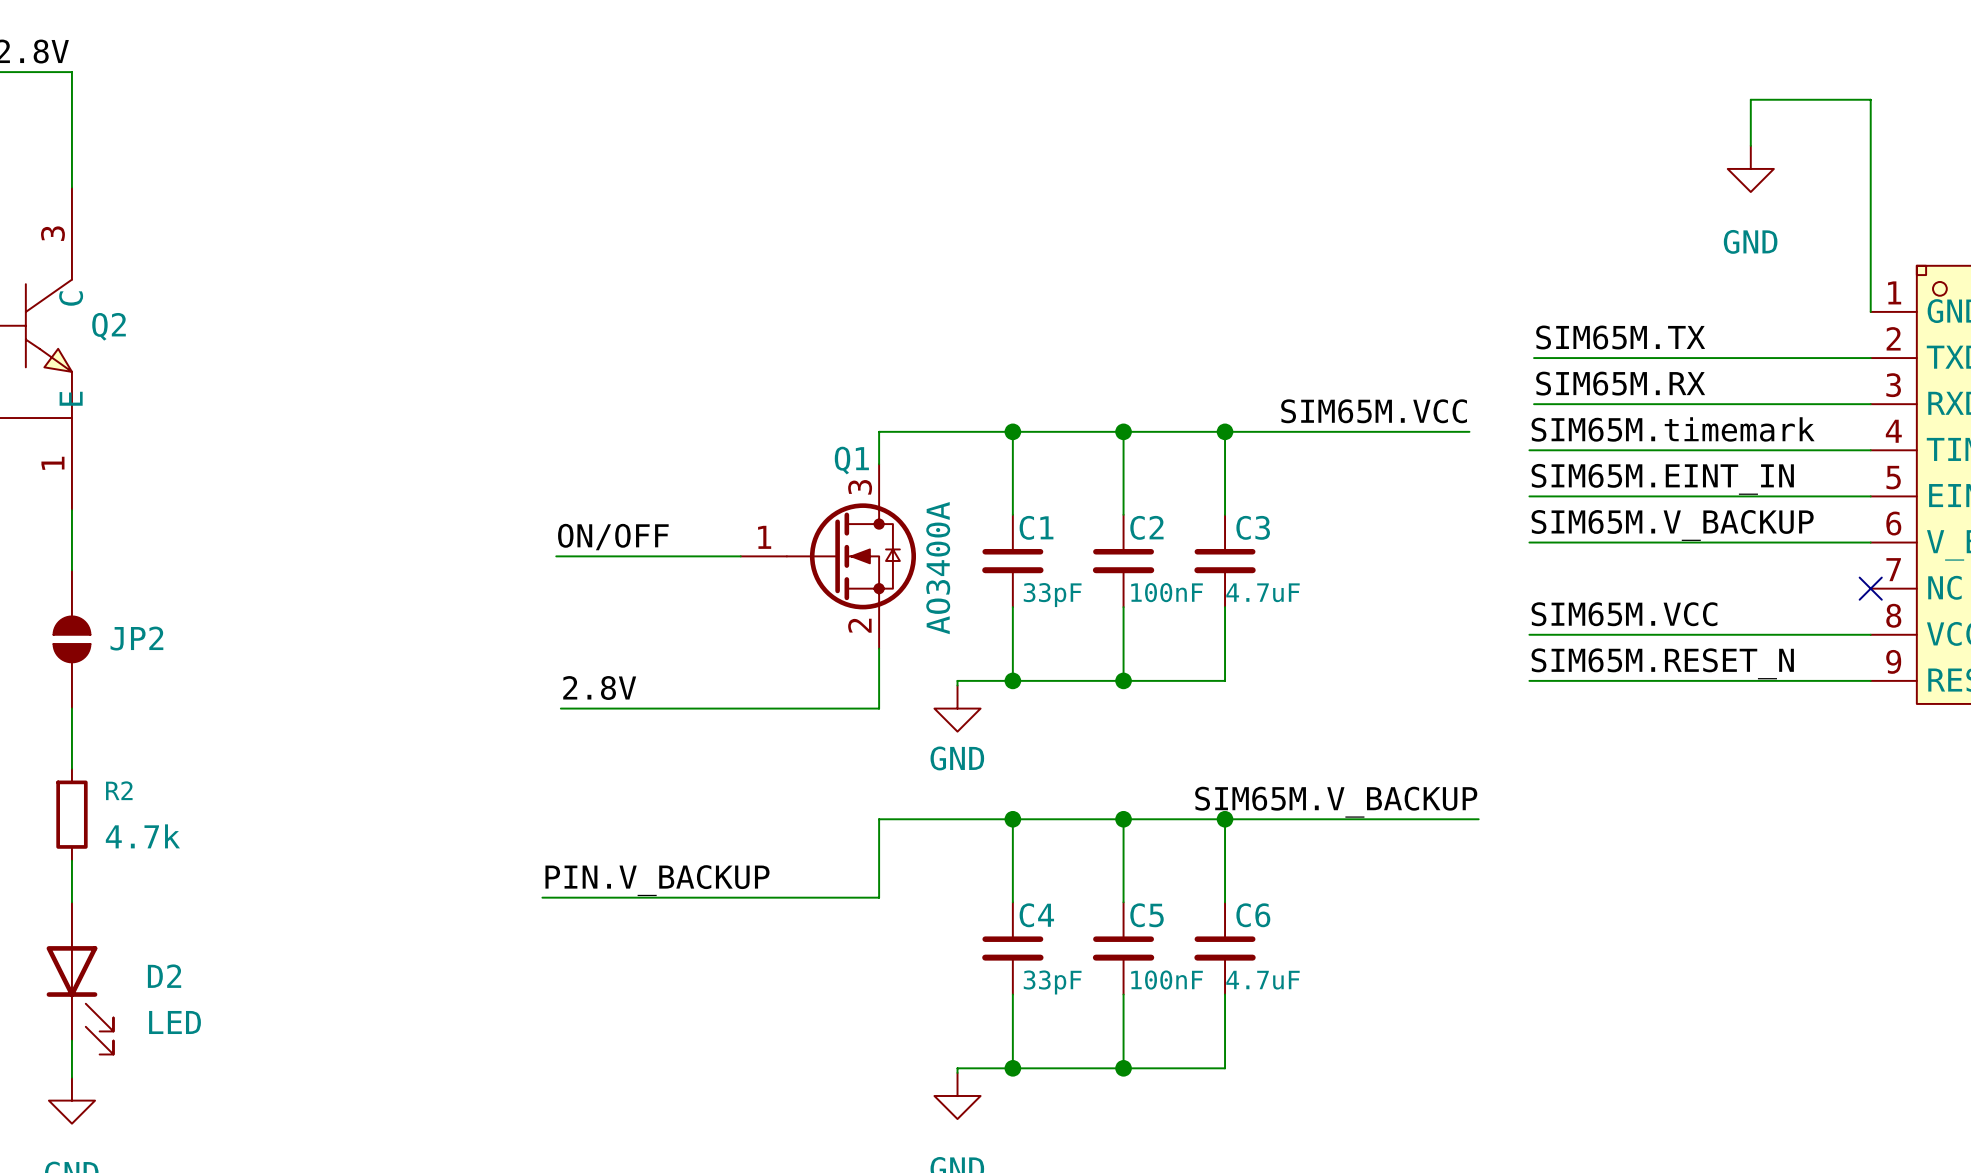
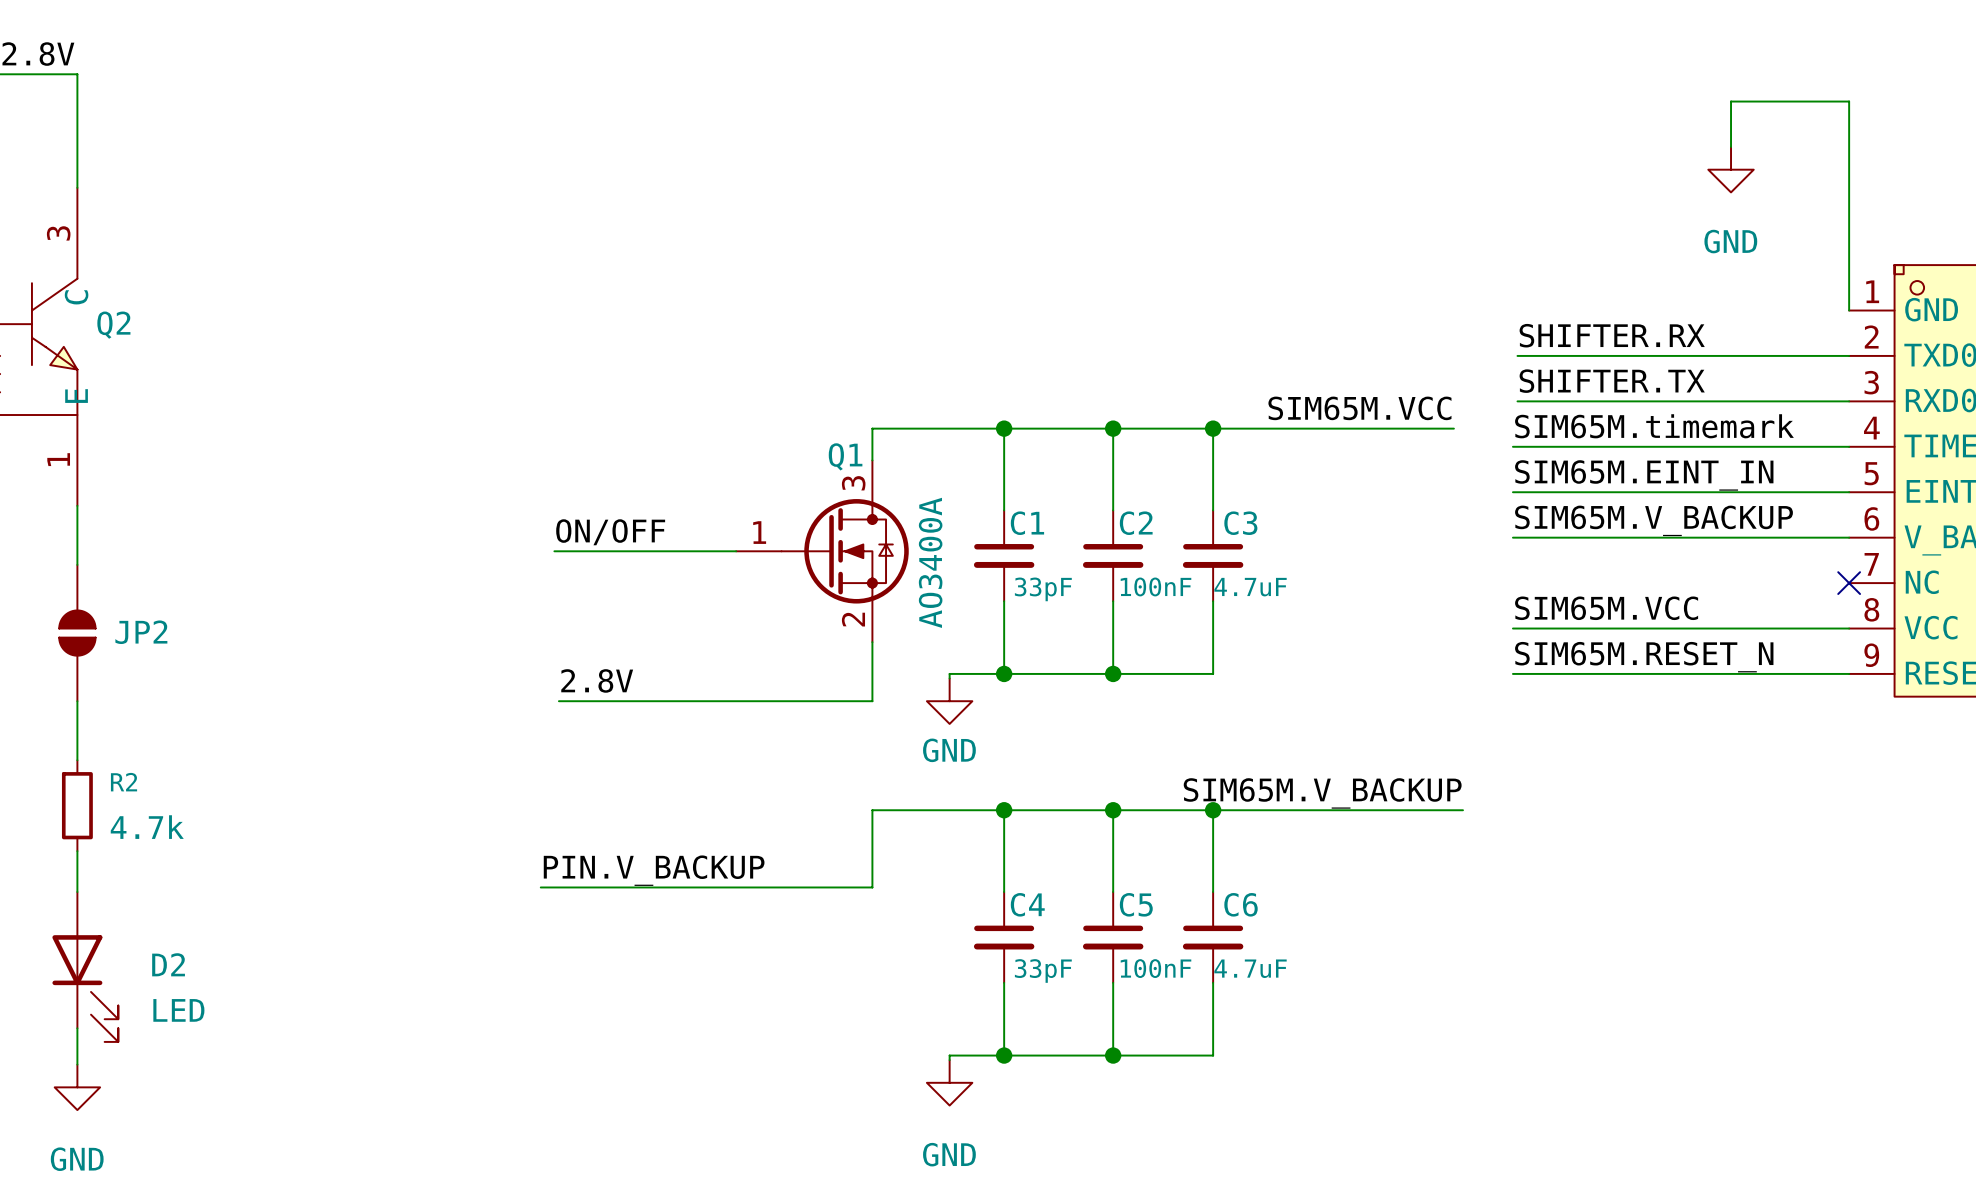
label: SIM65M.TX (1620, 337) -> SHIFTER.RX (1612, 335)
label: SIM65M.RX (1620, 383) -> SHIFTER.TX (1612, 381)

